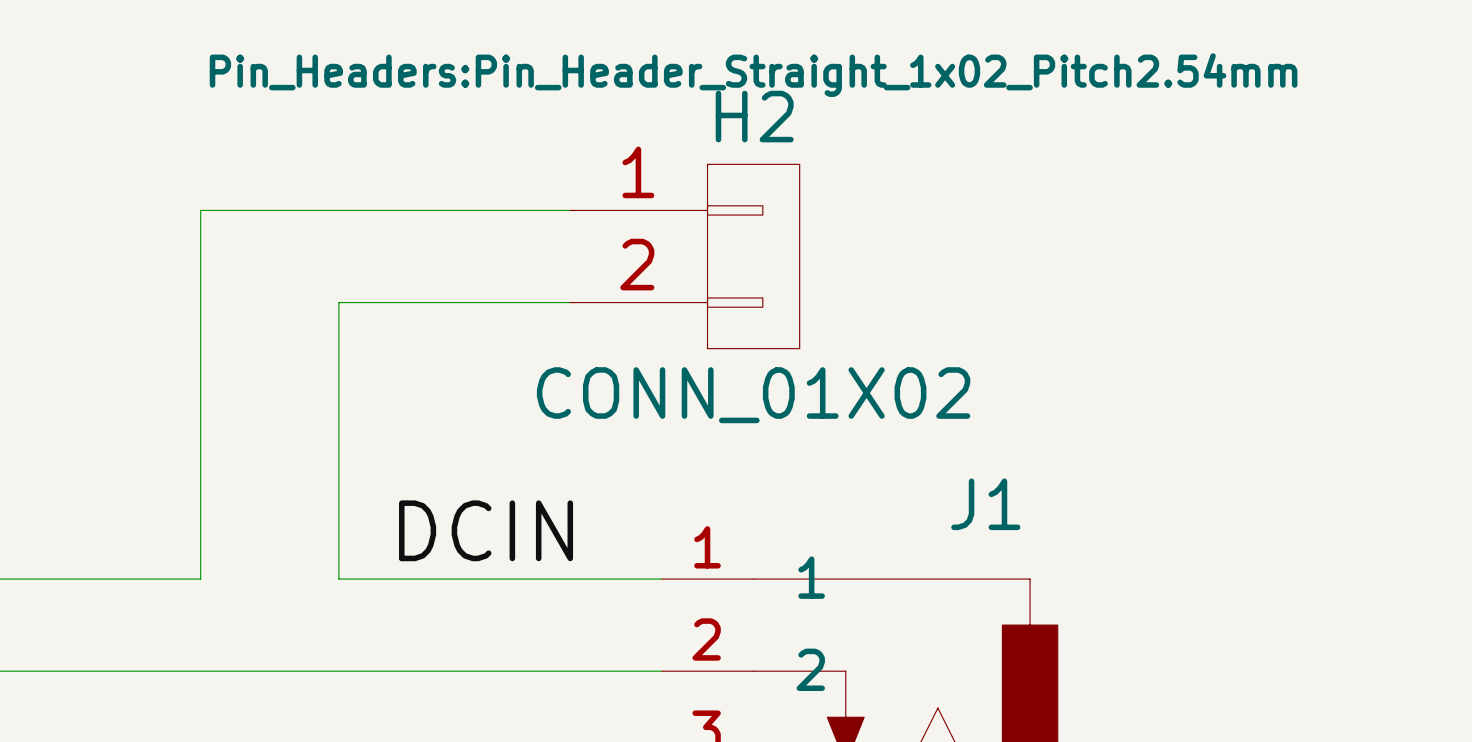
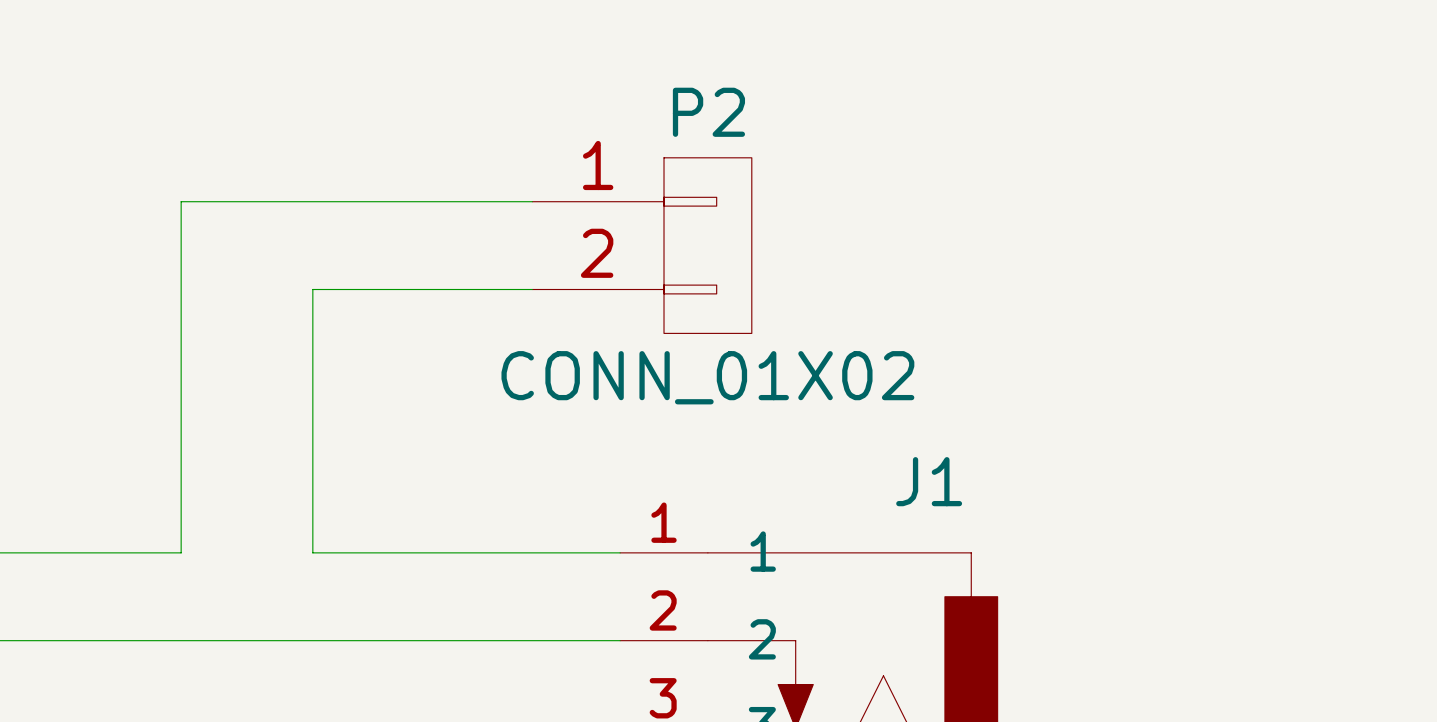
H2 text: Pin_Headers:Pin_Header_Straight_1x02_Pitch2.54mm (753, 75) -> none
H2 name: H2 (754, 116) -> P2 (708, 112)
label: DCIN (486, 530) -> none

